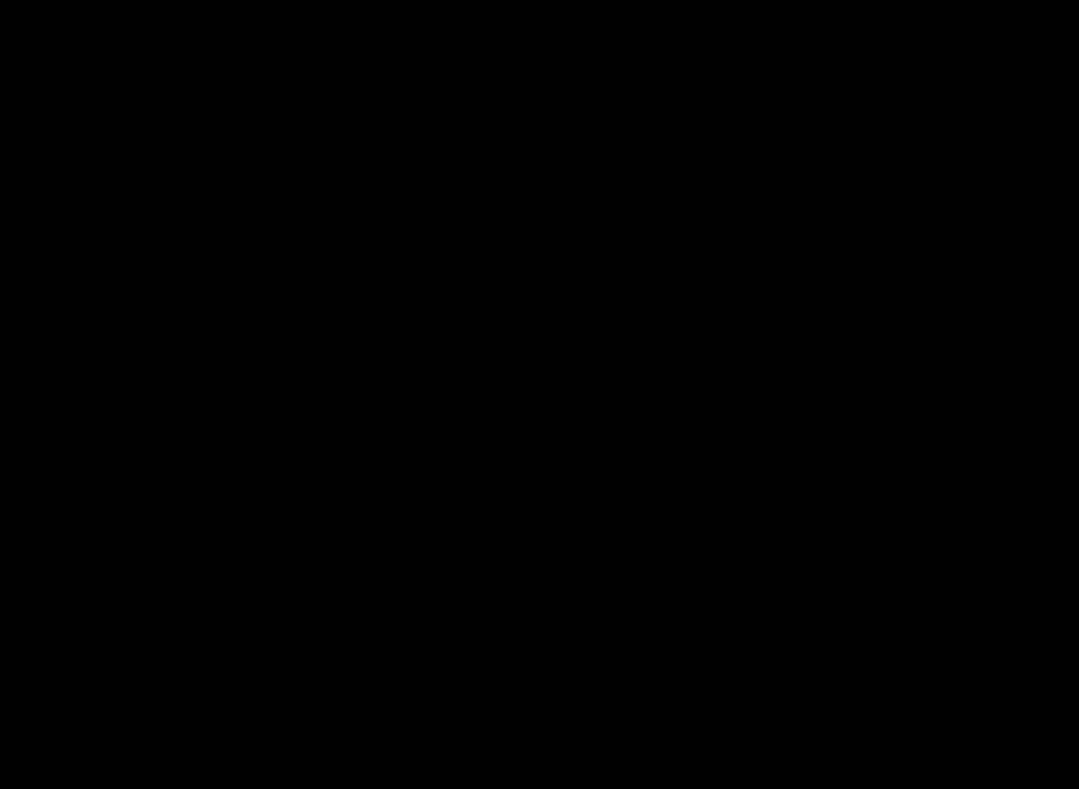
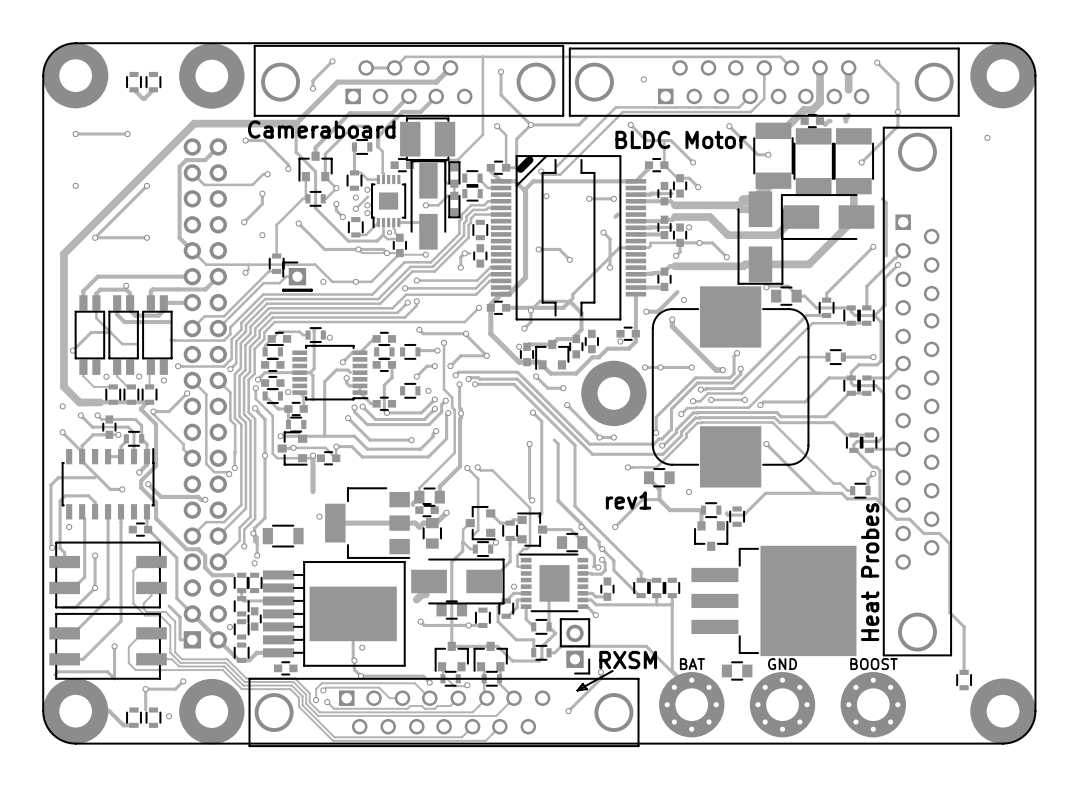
board edge: none -> (75, 43) (1003, 43) (1015, 45) (1022, 49) (1031, 59) (1035, 75) (1035, 711) (1032, 723) (1028, 730) (1015, 741) (1003, 743) (75, 743) (67, 742) (55, 736) (47, 727) (43, 711) (43, 75) (45, 63) (52, 52) (63, 45) (75, 43)
track: none -> (482, 56) (482, 134) (457, 159) (445, 161) (445, 181) (447, 183) (454, 183) (454, 195) (447, 195) (438, 205) (425, 205)
track: none -> (332, 61) (312, 80) (312, 88)
via: none -> (332, 61)
track: none -> (877, 62) (897, 83) (897, 126) (861, 162)
via: none -> (877, 62)
track: none -> (366, 67) (394, 67) (405, 56) (780, 56) (791, 67)
track: none -> (450, 67) (436, 82) (337, 82) (296, 123)
track: none -> (764, 67) (764, 98) (750, 112) (622, 112) (560, 174) (544, 174) (541, 171)
track: none -> (820, 67) (820, 98)
track: none -> (848, 67) (848, 89)
track: none -> (501, 71) (501, 95) (530, 124)
via: none -> (501, 71)
part: none -> (75, 75)
part: none -> (1003, 75)
part: none -> (211, 76)
via: none -> (643, 79)
part: none -> Cameraboard (408, 80)
part: none -> (134, 82)
part: none -> (153, 82)
part: none -> BLDC Motor (764, 82)
via: none -> (312, 88)
track: none -> (134, 89) (144, 98)
track: none -> (153, 89) (144, 98)
track: none -> (408, 96) (392, 113) (349, 113) (315, 147) (315, 156)
track: none -> (436, 96) (420, 111) (402, 111) (378, 136) (378, 146) (382, 151) (383, 179)
track: none -> (750, 96) (738, 107) (716, 107)
track: none -> (820, 98) (820, 102) (812, 110) (803, 110) (783, 130) (773, 130)
track: none -> (655, 107) (615, 107) (556, 166)
track: none -> (655, 107) (676, 107)
track: none -> (676, 107) (688, 107)
track: none -> (688, 107) (699, 107)
track: none -> (699, 107) (716, 107)
via: none -> (897, 111)
track: none -> (848, 115) (845, 121)
track: none -> (586, 117) (578, 124) (530, 124)
part: none -> (812, 121)
track: none -> (820, 121) (825, 124) (830, 121)
track: none -> (296, 123) (296, 152) (315, 171) (315, 208) (348, 241) (377, 241) (383, 233)
track: none -> (296, 123) (194, 123) (63, 253) (63, 386) (79, 402) (149, 402)
track: none -> (530, 124) (516, 139) (515, 167) (506, 167) (506, 135) (497, 126)
via: none -> (530, 124)
track: none -> (630, 124) (646, 140) (670, 140) (693, 162)
via: none -> (630, 124)
track: none -> (368, 126) (353, 126) (325, 154) (325, 177) (336, 188) (325, 198) (323, 198)
via: none -> (497, 126)
track: none -> (729, 126) (757, 154) (768, 154)
via: none -> (729, 126)
track: none -> (75, 134) (127, 134)
via: none -> (75, 134)
via: none -> (127, 134)
via: none -> (987, 137)
part: none -> (427, 139)
track: none -> (245, 140) (264, 140) (288, 164) (288, 169)
via: none -> (245, 140)
track: none -> (664, 140) (664, 165) (677, 178) (689, 178) (698, 187)
track: none -> (218, 146) (205, 160) (186, 160) (179, 166) (179, 237) (206, 264) (315, 264) (332, 281) (371, 281) (399, 253)
track: none -> (354, 146) (354, 172) (360, 172) (367, 179) (378, 179)
part: none -> (362, 146)
via: none -> (768, 154)
part: none -> (773, 155)
part: none -> (813, 161)
part: none -> (853, 161)
via: none -> (693, 162)
via: none -> (861, 162)
part: none -> (402, 165)
track: none -> (649, 165) (649, 168) (635, 181) (533, 181) (524, 190)
part: none -> (656, 165)
part: none -> (315, 166)
track: none -> (490, 167) (490, 171) (501, 181) (515, 181) (524, 190)
part: none -> (498, 167)
via: none -> (288, 169)
via: none -> (541, 171)
track: none -> (192, 172) (204, 184) (252, 184) (263, 174) (267, 174)
via: none -> (267, 174)
part: none -> (454, 174)
track: none -> (305, 176) (305, 196) (307, 198) (302, 198) (276, 225) (276, 256)
part: none -> (472, 178)
track: none -> (480, 178) (487, 187) (501, 187)
part: none -> (354, 180)
via: none -> (75, 185)
track: none -> (146, 185) (95, 237) (146, 237)
via: none -> (146, 185)
part: none -> (680, 185)
track: none -> (853, 186) (853, 214) (856, 217) (809, 264) (669, 266) (663, 272) (635, 274)
via: none -> (698, 187)
via: none -> (336, 188)
via: none -> (367, 189)
track: none -> (524, 190) (525, 277) (509, 294) (501, 294) (490, 304) (490, 333) (519, 362) (539, 362) (550, 373) (576, 373) (592, 357) (598, 357) (607, 348) (628, 348) (635, 341) (635, 333)
track: none -> (262, 193) (262, 204) (244, 222)
via: none -> (262, 193)
part: none -> (472, 193)
part: none -> (664, 193)
track: none -> (672, 193) (635, 194)
track: none -> (367, 196) (355, 208)
via: none -> (546, 196)
via: none -> (355, 197)
part: none -> (315, 198)
track: none -> (589, 198) (613, 198)
via: none -> (589, 198)
via: none -> (613, 198)
track: none -> (882, 198) (886, 202) (886, 255)
track: none -> (743, 200) (753, 200) (773, 180) (760, 193) (760, 209) (741, 209) (737, 205) (674, 205) (670, 201) (664, 201)
part: none -> (388, 201)
track: none -> (501, 201) (488, 201) (484, 205) (471, 205) (461, 214) (459, 221) (459, 233) (430, 262) (404, 262) (372, 294) (263, 294) (230, 327) (230, 334) (224, 340) (170, 340)
track: none -> (635, 201) (664, 201)
track: none -> (336, 204) (336, 210) (342, 217)
via: none -> (336, 204)
part: none -> (454, 204)
via: none -> (367, 205)
via: none -> (425, 205)
part: none -> (428, 205)
track: none -> (501, 207) (473, 209) (466, 216) (464, 223) (464, 235) (432, 266) (410, 266) (378, 299) (265, 299) (241, 322) (241, 329) (231, 339) (231, 358) (224, 366) (178, 366)
via: none -> (355, 208)
via: none -> (367, 213)
track: none -> (501, 214) (474, 214) (468, 225) (468, 237) (434, 271) (412, 271) (380, 303) (267, 303) (245, 324) (245, 331) (236, 341) (236, 363) (230, 369)
track: none -> (617, 214) (615, 216)
via: none -> (342, 217)
track: none -> (801, 217) (795, 217) (777, 235) (728, 235) (709, 217) (674, 217) (672, 219) (663, 221) (635, 221)
part: none -> (827, 217)
via: none -> (244, 222)
track: none -> (378, 222) (366, 234) (355, 234)
track: none -> (383, 222) (383, 235) (387, 239) (398, 239) (399, 237) (393, 228) (393, 222)
track: none -> (398, 222) (419, 222) (428, 231)
track: none -> (298, 223) (324, 249) (383, 249) (386, 253)
via: none -> (298, 223)
part: none -> (355, 227)
part: none -> (664, 227)
track: none -> (671, 227) (635, 227)
via: none -> (689, 227)
part: none -> (480, 229)
via: none -> (389, 232)
track: none -> (603, 232) (610, 239) (610, 267)
via: none -> (603, 232)
track: none -> (635, 234) (664, 235)
via: none -> (262, 235)
part: none -> (680, 235)
via: none -> (95, 237)
via: none -> (146, 237)
part: none -> (568, 237)
part: none -> (760, 237)
track: none -> (680, 242) (680, 252) (676, 255)
track: none -> (680, 242) (699, 242)
track: none -> (680, 242) (650, 242) (648, 247) (619, 247) (572, 294) (572, 298) (569, 301)
track: none -> (699, 242) (712, 242) (726, 257)
via: none -> (699, 242)
part: none -> (399, 245)
track: none -> (873, 246) (826, 293) (826, 300)
via: none -> (873, 246)
track: none -> (358, 249) (362, 253) (399, 253)
via: none -> (358, 249)
track: none -> (538, 249) (559, 249) (569, 259)
via: none -> (538, 249)
track: none -> (903, 250) (866, 286) (866, 307)
via: none -> (386, 253)
track: none -> (399, 253) (401, 254) (425, 254)
via: none -> (464, 253)
track: none -> (470, 253) (464, 253) (460, 257) (460, 267)
via: none -> (425, 254)
part: none -> (480, 255)
via: none -> (676, 255)
via: none -> (726, 257)
via: none -> (569, 259)
part: none -> (276, 263)
track: none -> (248, 264) (248, 269) (245, 272)
track: none -> (897, 265) (884, 277) (884, 305) (874, 315)
via: none -> (897, 265)
via: none -> (460, 267)
track: none -> (501, 267) (490, 267) (477, 280) (416, 280)
via: none -> (610, 267)
track: none -> (276, 271) (269, 271) (224, 316) (204, 316) (192, 328)
via: none -> (245, 272)
track: none -> (501, 274) (490, 274) (475, 288) (405, 288)
track: none -> (192, 276) (97, 276) (83, 291) (83, 302)
track: none -> (218, 276) (205, 289) (152, 289) (150, 302)
track: none -> (297, 276) (286, 276) (279, 283) (263, 283) (218, 328)
part: none -> (297, 276)
part: none -> (664, 279)
via: none -> (416, 280)
track: none -> (501, 280) (489, 280) (476, 294) (406, 294) (392, 308) (268, 308) (250, 326) (250, 333) (240, 343) (240, 368) (234, 374) (234, 418) (241, 424) (241, 504) (224, 522) (206, 522) (192, 536)
via: none -> (323, 281)
via: none -> (355, 281)
via: none -> (126, 285)
track: none -> (664, 286) (635, 287)
track: none -> (766, 287) (787, 286) (796, 296) (804, 296) (816, 307) (851, 307) (851, 311) (855, 315) (874, 315)
via: none -> (766, 287)
via: none -> (405, 288)
track: none -> (126, 289) (130, 293) (130, 310) (135, 315) (158, 315) (163, 310) (163, 302) (192, 302)
track: none -> (126, 289) (100, 289) (96, 293) (96, 318) (122, 344) (137, 344)
track: none -> (677, 292) (657, 311) (646, 311)
track: none -> (635, 294) (635, 333)
part: none -> (786, 296)
via: none -> (683, 300)
track: none -> (416, 301) (416, 305) (404, 317) (272, 317) (259, 330) (259, 337) (250, 347) (250, 372) (244, 377) (244, 414) (250, 420) (250, 516) (239, 527) (239, 540) (218, 562)
via: none -> (416, 301)
track: none -> (569, 301) (539, 301) (530, 310) (530, 322) (524, 328)
track: none -> (569, 301) (563, 307) (506, 307)
track: none -> (569, 301) (581, 312) (581, 329) (576, 335) (576, 339) (557, 339) (552, 344) (529, 344) (527, 346)
track: none -> (117, 302) (117, 314) (124, 322) (169, 322)
track: none -> (407, 302) (397, 312) (270, 312) (255, 328) (255, 335) (245, 345) (245, 370) (239, 376) (239, 416) (245, 422) (245, 508) (218, 536)
via: none -> (407, 302)
track: none -> (479, 307) (464, 322) (274, 322) (264, 332) (264, 339) (254, 349) (254, 373) (248, 379) (248, 412) (255, 418) (255, 518) (244, 529) (244, 546)
via: none -> (479, 307)
part: none -> (498, 307)
part: none -> (826, 307)
via: none -> (530, 310)
via: none -> (646, 311)
track: none -> (826, 315) (806, 315) (733, 388) (700, 389)
part: none -> (851, 315)
part: none -> (866, 315)
track: none -> (874, 315) (881, 322) (881, 360) (877, 364) (858, 364) (851, 372) (851, 383) (853, 385) (875, 385) (883, 393) (883, 436) (878, 441) (857, 441) (853, 444) (853, 450) (872, 467) (876, 467) (879, 470) (879, 502)
track: none -> (672, 319) (672, 326) (715, 370) (722, 370)
via: none -> (672, 319)
track: none -> (866, 323) (812, 323) (742, 393) (708, 393) (700, 401) (693, 401)
track: none -> (315, 328) (314, 368) (310, 372)
via: none -> (524, 328)
track: none -> (419, 329) (423, 333) (466, 333) (486, 355) (460, 355) (450, 366)
via: none -> (419, 329)
track: none -> (110, 332) (91, 332) (73, 350)
via: none -> (466, 333)
part: none -> (628, 333)
part: none -> (89, 335)
part: none -> (123, 335)
part: none -> (157, 335)
track: none -> (308, 335) (302, 335) (299, 331) (279, 331) (265, 345) (265, 351)
part: none -> (315, 335)
via: none -> (329, 337)
part: none -> (279, 338)
track: none -> (376, 338) (373, 338) (359, 352) (352, 352) (342, 362)
part: none -> (384, 338)
part: none -> (591, 341)
via: none -> (620, 341)
track: none -> (443, 342) (443, 389) (452, 397) (452, 407) (454, 409) (454, 452) (419, 488) (419, 497) (412, 504)
via: none -> (443, 342)
via: none -> (519, 346)
part: none -> (576, 346)
via: none -> (73, 350)
track: none -> (437, 350) (417, 351)
via: none -> (437, 350)
part: none -> (272, 351)
part: none -> (384, 351)
part: none -> (410, 351)
track: none -> (737, 353) (734, 356) (734, 373) (729, 377) (695, 377) (656, 417) (656, 432)
via: none -> (737, 353)
part: none -> (527, 354)
part: none -> (552, 354)
via: none -> (486, 355)
track: none -> (828, 357) (799, 357) (748, 407) (687, 408) (681, 414)
part: none -> (835, 357)
track: none -> (843, 357) (873, 357)
via: none -> (873, 357)
via: none -> (342, 362)
track: none -> (903, 363) (888, 377) (866, 377)
part: none -> (272, 364)
part: none -> (384, 364)
track: none -> (391, 364) (391, 377) (384, 385) (384, 410) (386, 412) (421, 412) (434, 399)
via: none -> (178, 366)
track: none -> (434, 366) (427, 366) (416, 376)
via: none -> (434, 366)
via: none -> (450, 366)
track: none -> (83, 367) (83, 376) (93, 386) (113, 386)
track: none -> (117, 367) (117, 376) (127, 386) (131, 386)
track: none -> (150, 367) (149, 386)
track: none -> (645, 367) (691, 367)
via: none -> (645, 367)
via: none -> (660, 367)
via: none -> (691, 367)
track: none -> (740, 368) (740, 374) (731, 382) (697, 382) (671, 409) (671, 429) (653, 444) (589, 444) (517, 372) (458, 372) (455, 375)
via: none -> (740, 368)
via: none -> (230, 369)
via: none -> (722, 370)
track: none -> (310, 372) (312, 375) (312, 399)
track: none -> (310, 372) (264, 372) (257, 379)
part: none -> (330, 372)
track: none -> (350, 372) (348, 370) (336, 370) (324, 381) (324, 436)
via: none -> (455, 375)
via: none -> (106, 376)
via: none -> (139, 376)
via: none -> (416, 376)
track: none -> (536, 376) (547, 388) (563, 388)
via: none -> (536, 376)
track: none -> (851, 377) (829, 377) (805, 402) (763, 402) (760, 405)
track: none -> (346, 378) (346, 383) (349, 385) (359, 385) (359, 392) (371, 403) (376, 403)
via: none -> (346, 378)
via: none -> (257, 379)
track: none -> (468, 379) (517, 379) (592, 454) (662, 454) (695, 418) (700, 417) (774, 417) (779, 422) (833, 422) (846, 435) (869, 435)
via: none -> (468, 379)
via: none -> (163, 380)
track: none -> (192, 380) (206, 394) (206, 464) (214, 472) (229, 472) (229, 474)
track: none -> (218, 380) (230, 392) (230, 420) (235, 424) (235, 454)
part: none -> (272, 383)
track: none -> (459, 384) (460, 466) (439, 486) (439, 497)
via: none -> (459, 384)
track: none -> (475, 384) (514, 384) (574, 445) (574, 506) (641, 572) (641, 580) (656, 580)
via: none -> (475, 384)
part: none -> (851, 385)
part: none -> (866, 385)
part: none -> (730, 386)
track: none -> (255, 388) (255, 398) (272, 415) (272, 453) (277, 458) (310, 458) (312, 455) (313, 491)
via: none -> (255, 388)
via: none -> (563, 388)
via: none -> (700, 389)
part: none -> (410, 390)
via: none -> (428, 390)
part: none -> (917, 391)
via: none -> (288, 392)
track: none -> (299, 392) (303, 396) (303, 408)
track: none -> (187, 393) (169, 411) (153, 411) (153, 414) (183, 444) (183, 449) (192, 458)
via: none -> (187, 393)
part: none -> (205, 393)
part: none -> (613, 393)
track: none -> (866, 393) (849, 393) (825, 416) (781, 416) (776, 412) (693, 412) (662, 445)
part: none -> (113, 394)
part: none -> (131, 394)
part: none -> (149, 394)
track: none -> (265, 396) (278, 408) (288, 408) (288, 424)
part: none -> (272, 396)
via: none -> (434, 399)
track: none -> (711, 399) (744, 399)
via: none -> (711, 399)
via: none -> (744, 399)
track: none -> (445, 400) (441, 404) (441, 412) (429, 424) (367, 424) (354, 411) (354, 407)
via: none -> (445, 400)
via: none -> (693, 401)
track: none -> (147, 402) (140, 409) (156, 424) (156, 466) (141, 480) (141, 487) (156, 502) (156, 518) (186, 549) (198, 549) (205, 555) (205, 567) (212, 575) (232, 575)
part: none -> (384, 403)
track: none -> (567, 405) (599, 437) (613, 437)
via: none -> (567, 405)
via: none -> (760, 405)
via: none -> (62, 406)
track: none -> (362, 406) (375, 419) (424, 419) (434, 409)
via: none -> (362, 406)
via: none -> (354, 407)
track: none -> (255, 408) (265, 419) (265, 517) (254, 528) (254, 541) (257, 543)
via: none -> (255, 408)
part: none -> (296, 408)
via: none -> (434, 409)
via: none -> (153, 411)
via: none -> (386, 412)
track: none -> (532, 412) (541, 421) (541, 513) (538, 516)
via: none -> (532, 412)
track: none -> (448, 413) (446, 414) (446, 438) (428, 456) (362, 456) (351, 446) (336, 446)
via: none -> (448, 413)
via: none -> (461, 413)
via: none -> (681, 414)
track: none -> (80, 415) (92, 427) (128, 427) (134, 432) (134, 456)
via: none -> (80, 415)
track: none -> (97, 415) (101, 419) (135, 419) (141, 425) (141, 438) (146, 444) (146, 464) (139, 472)
via: none -> (97, 415)
track: none -> (348, 418) (370, 440) (411, 440)
via: none -> (348, 418)
part: none -> (296, 424)
part: none -> (109, 427)
track: none -> (436, 431) (420, 449) (367, 449) (354, 436) (305, 436) (302, 438) (300, 436) (280, 436)
via: none -> (436, 431)
track: none -> (62, 432) (82, 452)
via: none -> (62, 432)
via: none -> (656, 432)
track: none -> (118, 434) (93, 434) (82, 445) (82, 461) (110, 489) (122, 489)
via: none -> (118, 434)
via: none -> (280, 436)
via: none -> (599, 437)
via: none -> (613, 437)
track: none -> (126, 438) (121, 446) (121, 456) (108, 456)
part: none -> (134, 438)
via: none -> (411, 440)
track: none -> (554, 440) (558, 443) (558, 501) (599, 542) (599, 545) (613, 560) (613, 570) (641, 595)
part: none -> (853, 442)
part: none -> (869, 442)
track: none -> (529, 443) (529, 497) (532, 500)
via: none -> (529, 443)
track: none -> (766, 443) (815, 493)
via: none -> (766, 443)
via: none -> (662, 445)
track: none -> (336, 446) (336, 458) (325, 447) (289, 447) (282, 448) (292, 448) (293, 447)
via: none -> (336, 446)
via: none -> (293, 447)
part: none -> (292, 448)
track: none -> (903, 449) (869, 450)
track: none -> (235, 451) (234, 467)
via: none -> (265, 455)
via: none -> (312, 455)
part: none -> (328, 458)
via: none -> (234, 467)
track: none -> (477, 467) (480, 470) (492, 470) (530, 508) (530, 546) (517, 555) (517, 566) (526, 566)
via: none -> (477, 467)
track: none -> (627, 467) (656, 467) (686, 437) (686, 433) (697, 422) (772, 422) (833, 483) (840, 483) (847, 490) (852, 490)
via: none -> (627, 467)
track: none -> (467, 468) (478, 478) (478, 530) (473, 534)
via: none -> (467, 468)
via: none -> (139, 472)
track: none -> (873, 473) (868, 479) (868, 490)
via: none -> (873, 473)
via: none -> (229, 474)
track: none -> (95, 477) (58, 477) (50, 485) (52, 547)
track: none -> (649, 477) (659, 489) (659, 499)
part: none -> (659, 477)
part: none -> (108, 483)
track: none -> (148, 484) (161, 496) (198, 496) (201, 499) (205, 499)
via: none -> (148, 484)
via: none -> (122, 489)
part: none -> (860, 490)
via: none -> (689, 491)
part: none -> (429, 497)
via: none -> (205, 499)
track: none -> (659, 499) (642, 499) (615, 527)
track: none -> (659, 499) (670, 510) (703, 510) (701, 512) (701, 525)
via: none -> (532, 500)
text: none -> rev1 (628, 500)
part: none -> (427, 510)
part: none -> (711, 510)
track: none -> (82, 511) (82, 516) (84, 518) (84, 577) (73, 587) (64, 587)
track: none -> (95, 511) (95, 502) (88, 495) (65, 495) (60, 501) (60, 548) (64, 552) (64, 562)
track: none -> (108, 511) (108, 599) (73, 633) (64, 633)
track: none -> (121, 511) (121, 621) (83, 659) (64, 659)
track: none -> (146, 511) (146, 528) (176, 558) (176, 598) (238, 660) (249, 660) (256, 652) (278, 652)
track: none -> (446, 512) (436, 523) (423, 523) (419, 527) (415, 523) (335, 523)
via: none -> (446, 512)
track: none -> (726, 512) (727, 515) (743, 515) (765, 493) (841, 493) (847, 498) (875, 498) (896, 519) (909, 519) (923, 533) (939, 533) (949, 543) (949, 612) (964, 626) (964, 672)
track: none -> (490, 513) (500, 523) (522, 519)
via: none -> (319, 516)
part: none -> (737, 516)
part: none -> (367, 523)
track: none -> (470, 523) (463, 529) (463, 541)
part: none -> (480, 523)
via: none -> (69, 527)
via: none -> (581, 527)
via: none -> (615, 527)
part: none -> (140, 529)
part: none -> (532, 529)
track: none -> (542, 529) (570, 529) (594, 555) (593, 566)
part: none -> (510, 530)
track: none -> (253, 533) (257, 537) (257, 555)
via: none -> (253, 533)
part: none -> (432, 533)
part: none -> (283, 536)
part: none -> (711, 536)
track: none -> (522, 539) (510, 538) (510, 561) (490, 581) (484, 581)
track: none -> (463, 541) (462, 551) (451, 562) (451, 646) (497, 646) (512, 660) (539, 660) (541, 658) (541, 646) (555, 633) (549, 626) (549, 599) (547, 597)
track: none -> (463, 541) (470, 549) (475, 549)
via: none -> (495, 542)
part: none -> (572, 542)
via: none -> (244, 546)
via: none -> (52, 547)
part: none -> (483, 549)
via: none -> (602, 549)
track: none -> (95, 555) (95, 587) (75, 607) (62, 607)
via: none -> (95, 555)
via: none -> (257, 555)
track: none -> (602, 559) (605, 562) (605, 570) (601, 574) (582, 573)
via: none -> (602, 559)
track: none -> (151, 562) (142, 562) (133, 570) (133, 603) (145, 615) (160, 615) (170, 625) (170, 652) (180, 662) (225, 662) (244, 681) (293, 681) (306, 694) (306, 703) (318, 715) (496, 715) (514, 698) (499, 683) (500, 666)
via: none -> (254, 563)
via: none -> (598, 567)
text: none -> Heat Probes (870, 572)
part: none -> (108, 574)
part: none -> (457, 581)
part: none -> (241, 582)
part: none -> (254, 582)
part: none -> (553, 582)
via: none -> (514, 586)
via: none -> (95, 587)
track: none -> (151, 587) (151, 595) (143, 603) (143, 608) (146, 611) (165, 611) (175, 621) (175, 652) (181, 659) (227, 659) (246, 678) (294, 678) (309, 693) (309, 702) (319, 712) (472, 712) (486, 698) (484, 695) (484, 669) (480, 666)
part: none -> (641, 587)
part: none -> (656, 587)
part: none -> (672, 587)
part: none -> (607, 589)
track: none -> (241, 590) (241, 598) (244, 600) (278, 600)
track: none -> (526, 593) (513, 593) (498, 607) (498, 621) (516, 639) (533, 639) (533, 652)
track: none -> (582, 593) (592, 593) (595, 596) (607, 596)
track: none -> (425, 594) (421, 594) (416, 599)
track: none -> (656, 595) (656, 604)
track: none -> (672, 595) (672, 670) (691, 690) (691, 704)
track: none -> (526, 599) (517, 599) (517, 607) (506, 616)
track: none -> (582, 599) (591, 599) (596, 604) (672, 604)
part: none -> (773, 600)
track: none -> (169, 606) (180, 617) (180, 639) (192, 639)
part: none -> (241, 606)
track: none -> (526, 606) (526, 619) (533, 626)
track: none -> (582, 606) (587, 606) (595, 615)
part: none -> (506, 608)
part: none -> (451, 610)
part: none -> (334, 613)
track: none -> (353, 613) (354, 669) (360, 676) (423, 676) (429, 682)
via: none -> (595, 615)
part: none -> (482, 617)
part: none -> (254, 618)
track: none -> (420, 621) (424, 625) (482, 625)
via: none -> (420, 621)
via: none -> (468, 625)
part: none -> (541, 626)
via: none -> (229, 627)
part: none -> (241, 629)
track: none -> (151, 633) (142, 633) (128, 646) (128, 663) (135, 670) (222, 670) (241, 689) (290, 689) (298, 697) (298, 706) (333, 740) (485, 740) (499, 726)
part: none -> (108, 646)
track: none -> (114, 646) (114, 678) (107, 671) (57, 671) (54, 674)
via: none -> (114, 646)
part: none -> (574, 646)
via: none -> (362, 647)
part: none -> (241, 652)
part: none -> (541, 652)
track: none -> (549, 652) (554, 652) (561, 646) (646, 646) (691, 691)
part: none -> (451, 656)
part: none -> (490, 656)
track: none -> (151, 659) (171, 659) (179, 666) (224, 666) (243, 685) (291, 685) (302, 696) (302, 705) (334, 737) (461, 737) (472, 726)
via: none -> (354, 660)
text: none -> RXSM (628, 660)
track: none -> (442, 666) (442, 678) (447, 678) (454, 686) (467, 685)
part: none -> (285, 668)
line: none -> (612, 670) (577, 690)
part: none -> (737, 670)
track: none -> (600, 672) (600, 678) (568, 711)
via: none -> (600, 672)
via: none -> (360, 676)
part: none -> (450, 678)
part: none -> (491, 678)
part: none -> (964, 680)
track: none -> (183, 681) (175, 689) (145, 689) (145, 710)
via: none -> (183, 681)
via: none -> (429, 682)
via: none -> (467, 685)
via: none -> (145, 689)
track: none -> (323, 690) (326, 687) (379, 687) (389, 698) (402, 698)
via: none -> (323, 690)
line: none -> (577, 690) (586, 689) (582, 683) (577, 690)
track: none -> (429, 698) (414, 683) (321, 683) (316, 688) (316, 700)
track: none -> (458, 698) (450, 705) (437, 705) (434, 708) (424, 708) (421, 705) (410, 705) (407, 708) (333, 708) (327, 702)
via: none -> (316, 700)
via: none -> (327, 702)
part: none -> BAT (691, 704)
part: none -> GND (782, 704)
part: none -> BOOST (873, 704)
track: none -> (75, 711) (109, 711) (123, 725) (134, 725)
part: none -> (75, 711)
part: none -> (211, 711)
via: none -> (568, 711)
part: none -> (1003, 711)
part: none -> (444, 712)
via: none -> (169, 716)
part: none -> (134, 717)
part: none -> (153, 717)

